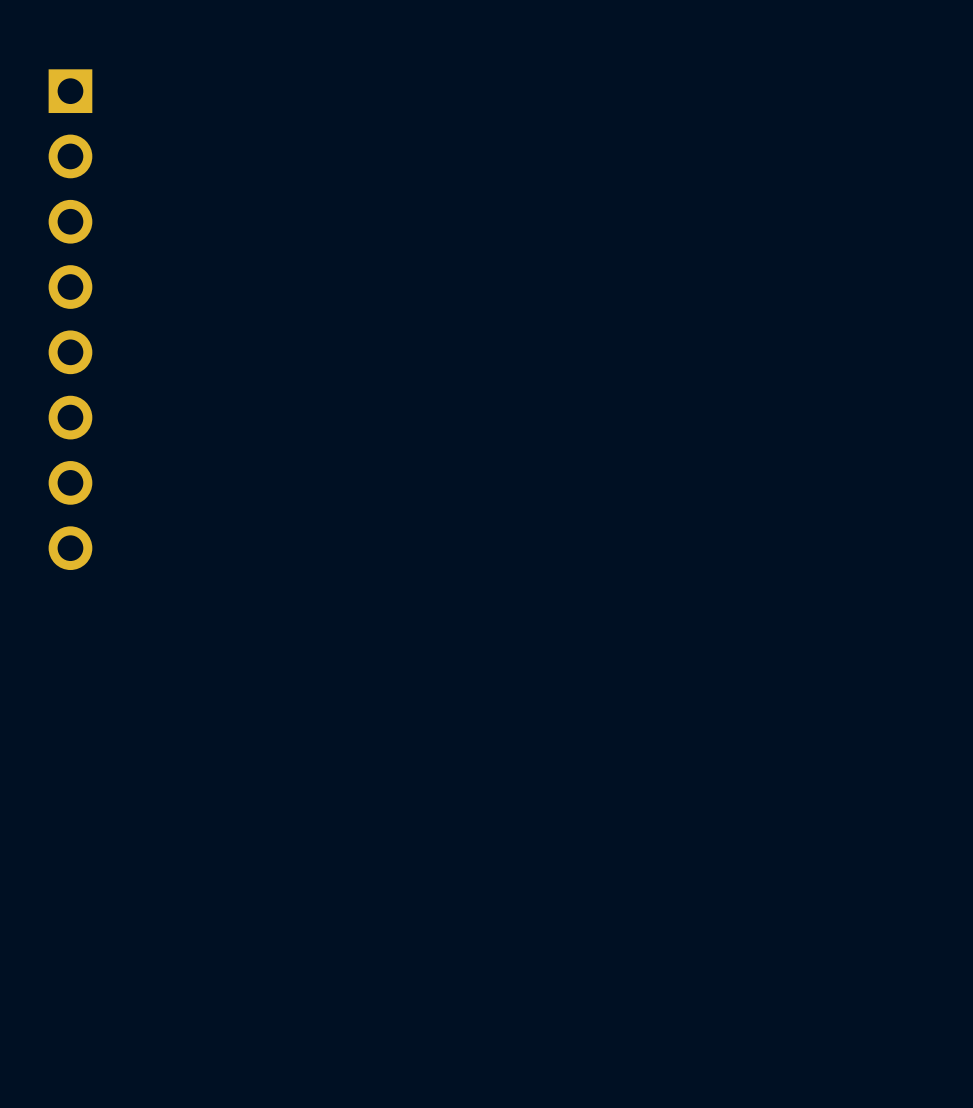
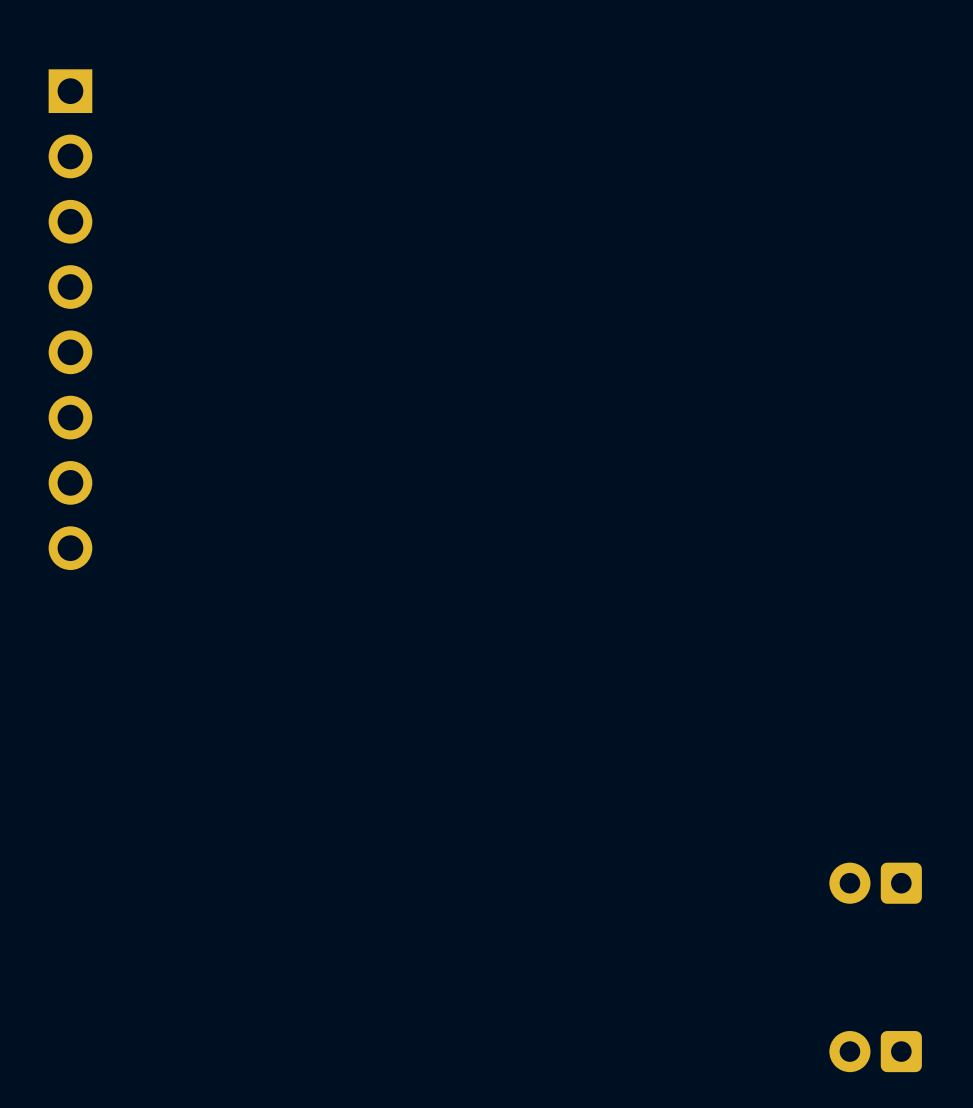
part: none -> (875, 883)
part: none -> (875, 1051)

